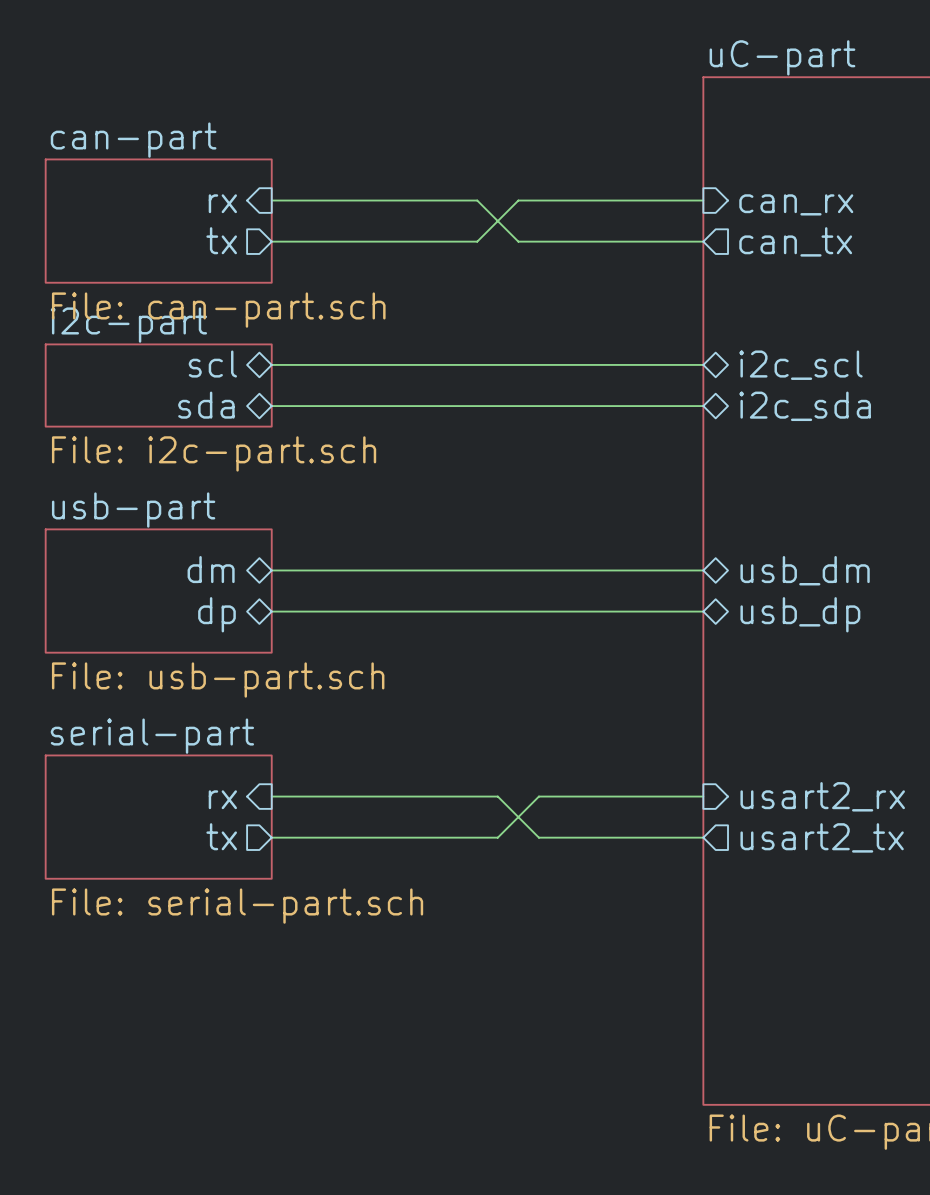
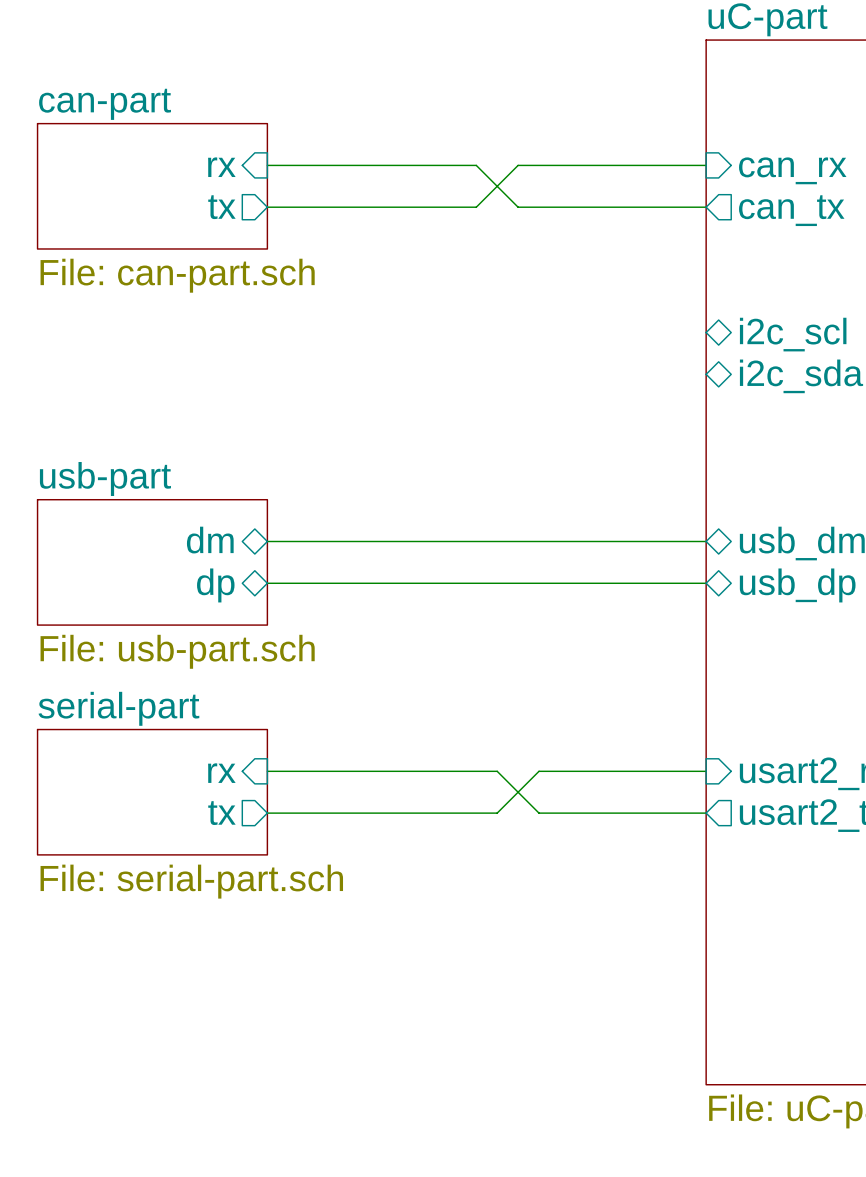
sheet pin: scl (212, 364) -> none
wire: (271, 364) (703, 364) -> none
sheet i2c-part: File: i2c-part.sch (158, 385) -> none
sheet pin: sda (206, 405) -> none
wire: (271, 406) (703, 406) -> none

